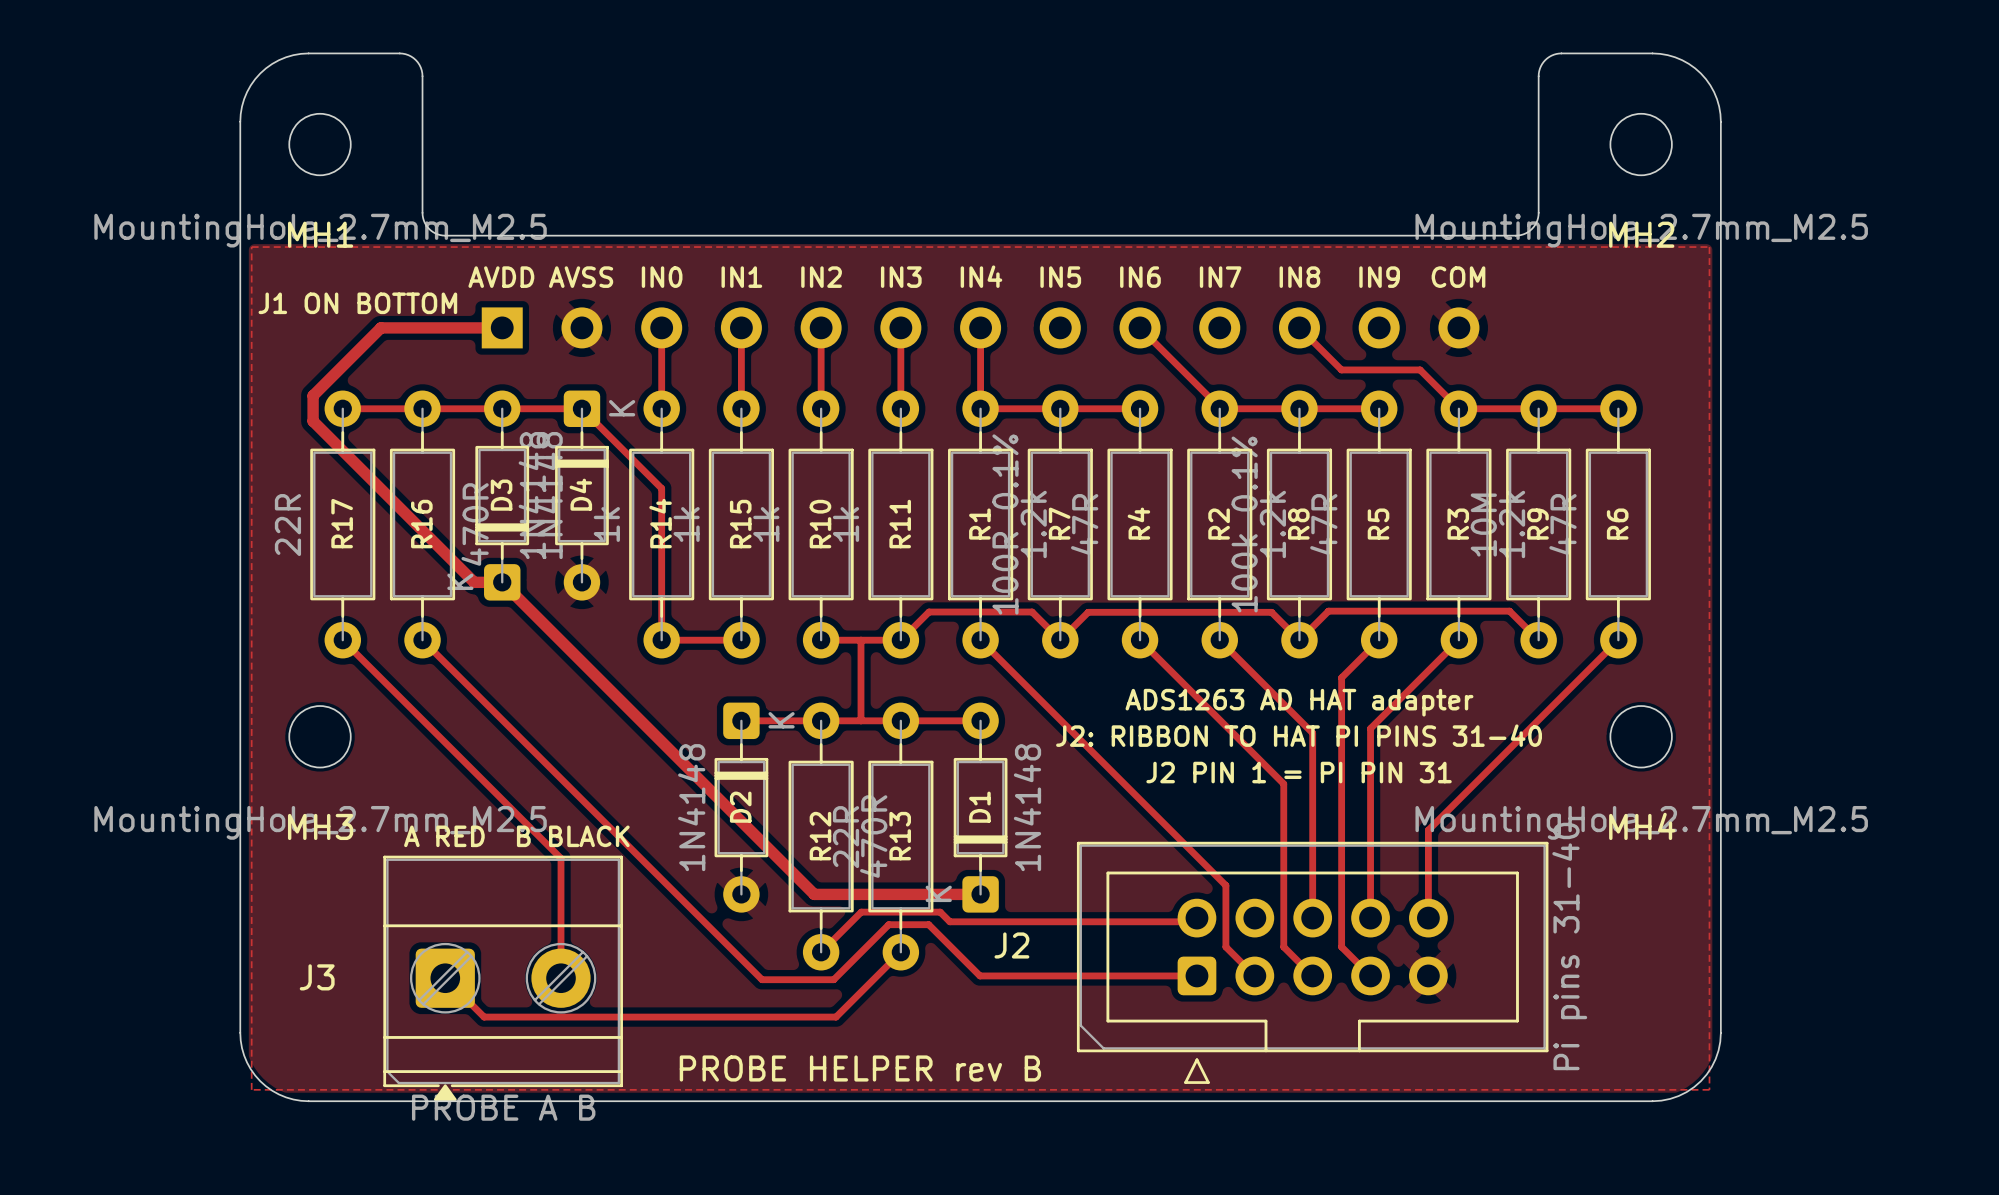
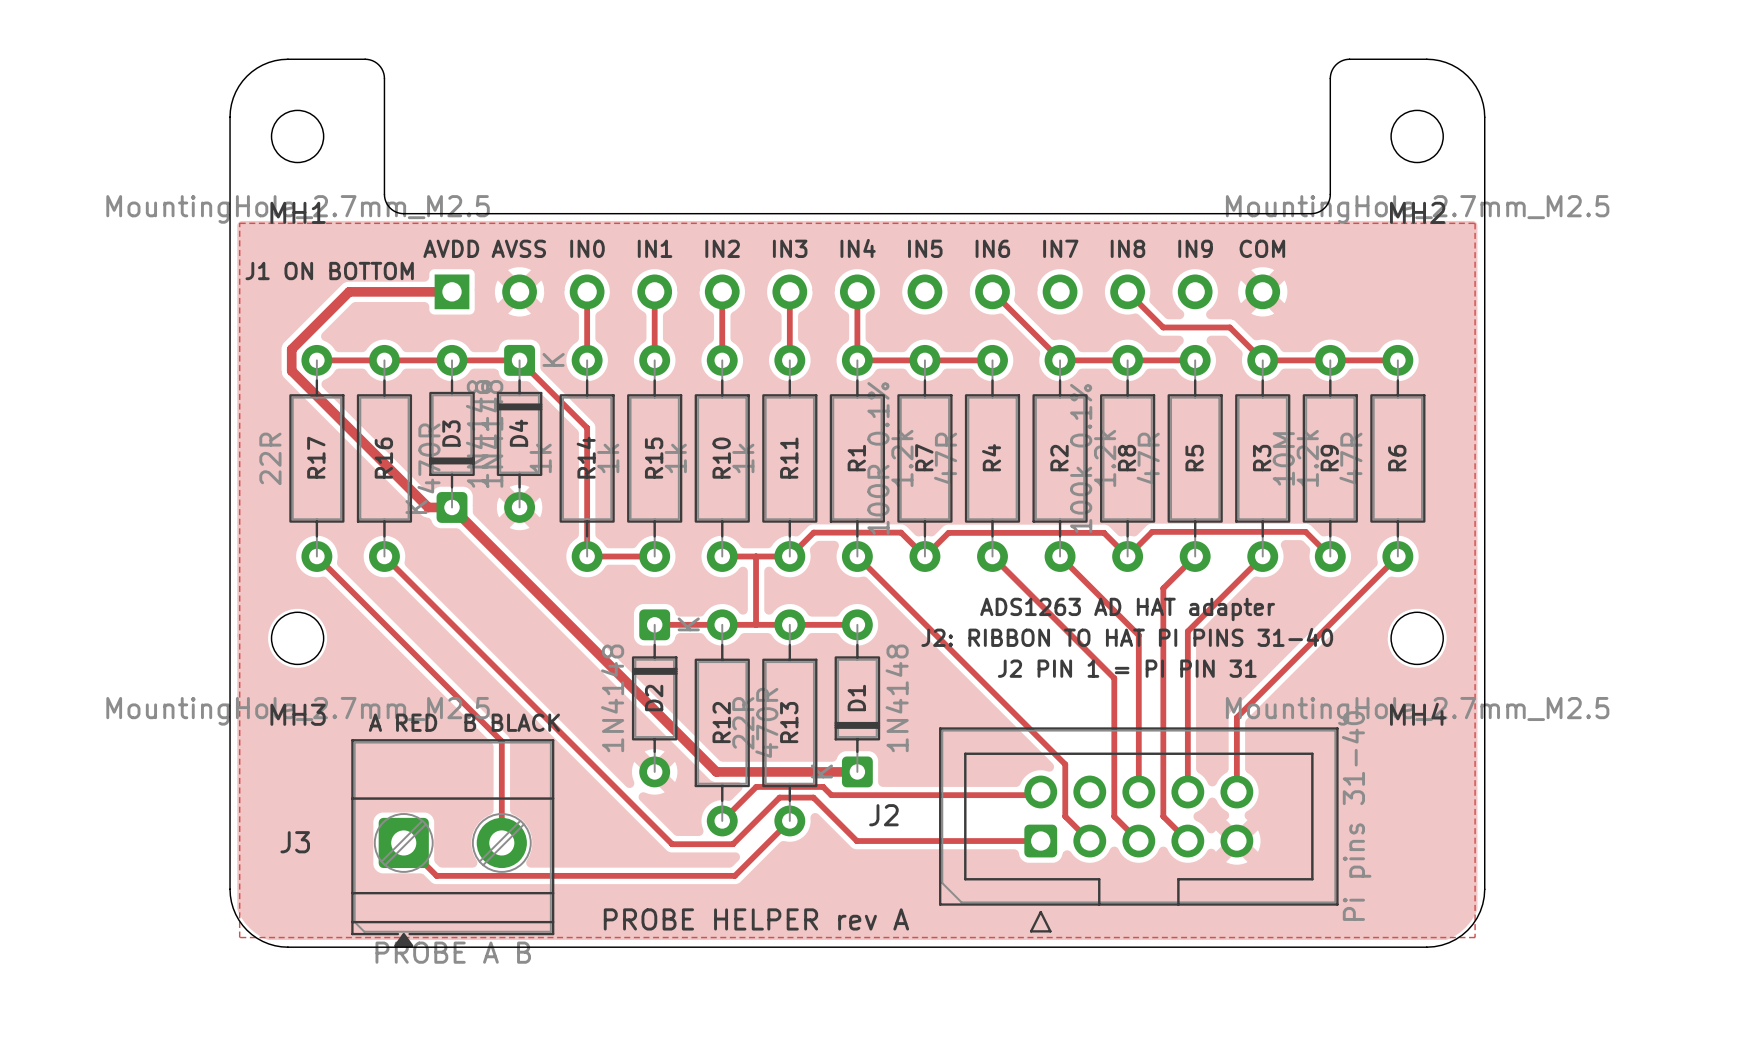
text: PROBE HELPER rev B (860, 1068) -> PROBE HELPER rev A (756, 919)

